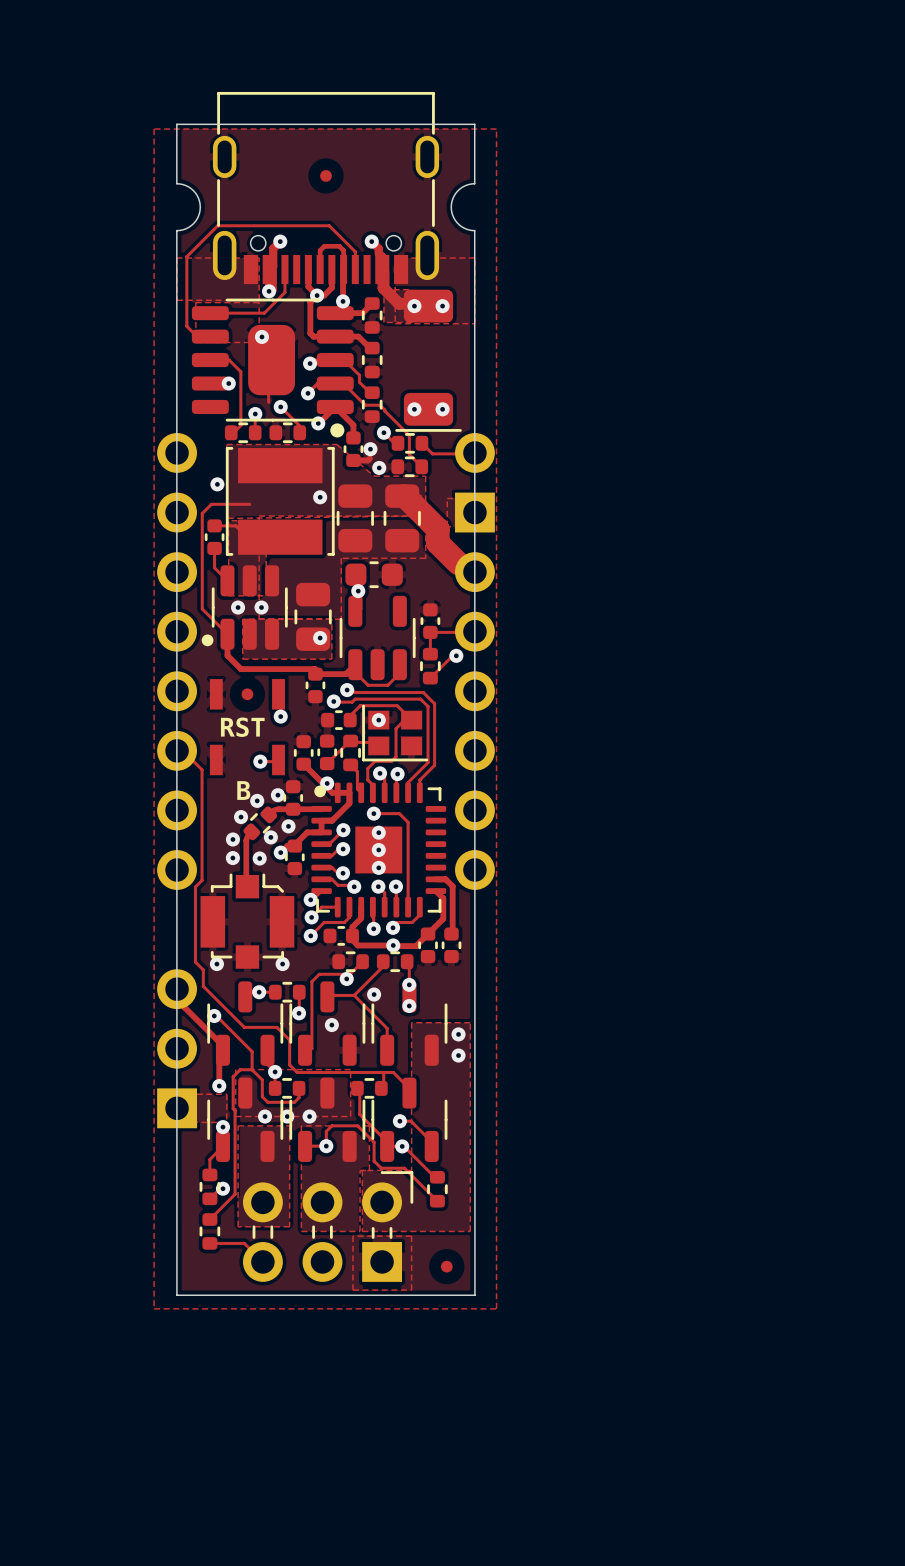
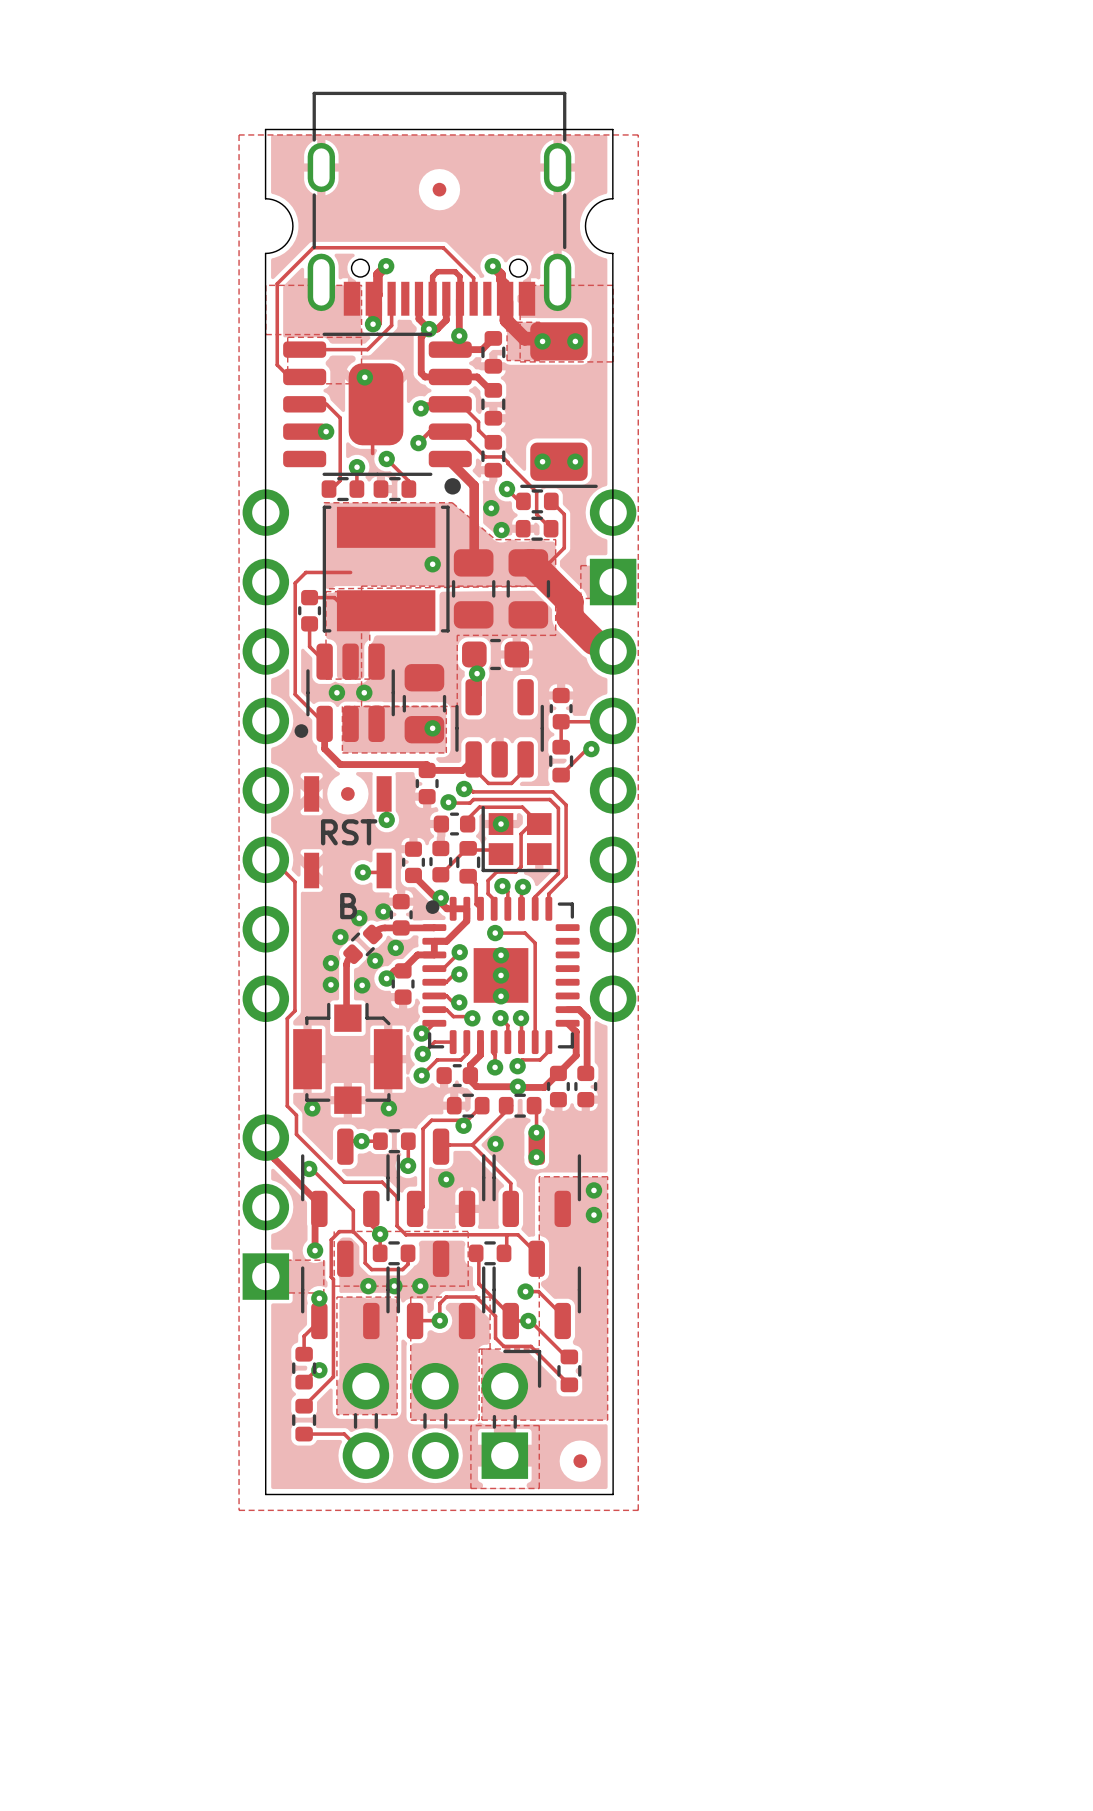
track: none -> (447, 458) (474, 485) (474, 562)
track: (318, 423) (335, 406) (353, 425) (353, 437) -> none
via: (318, 423) -> none
part: (353, 449) -> none
track: (468, 452) (432, 453) -> (549, 562) (564, 547) (563, 513)
track: (369, 458) (367, 460) (353, 460) -> none
via: (217, 484) -> none

